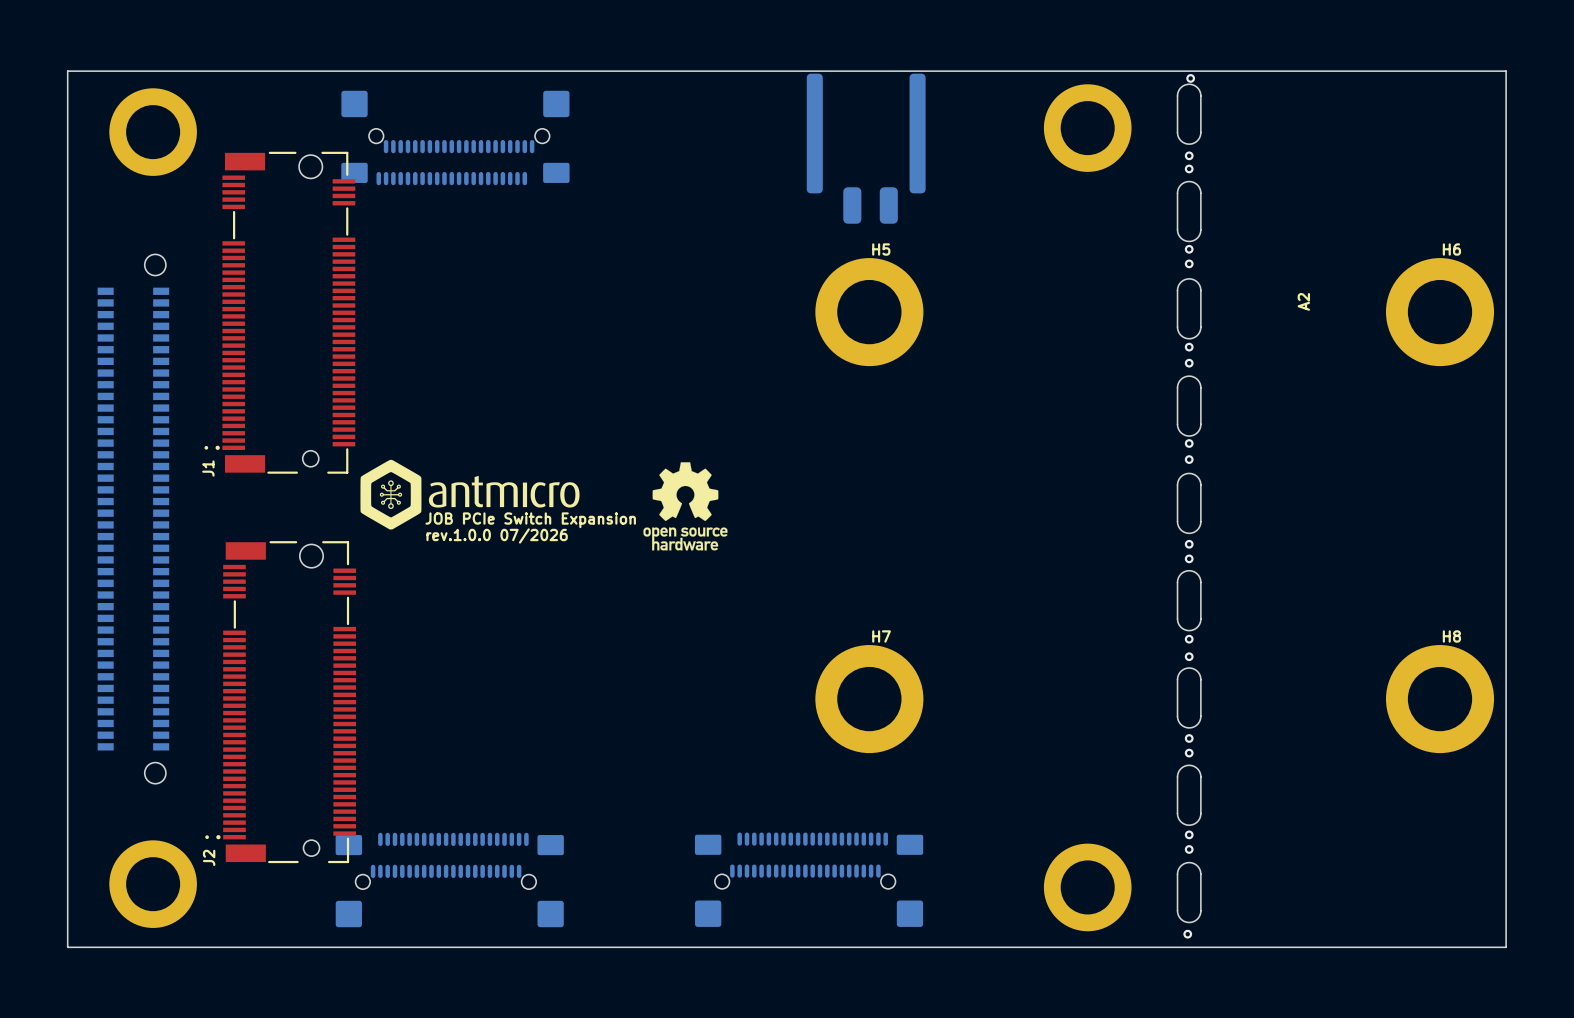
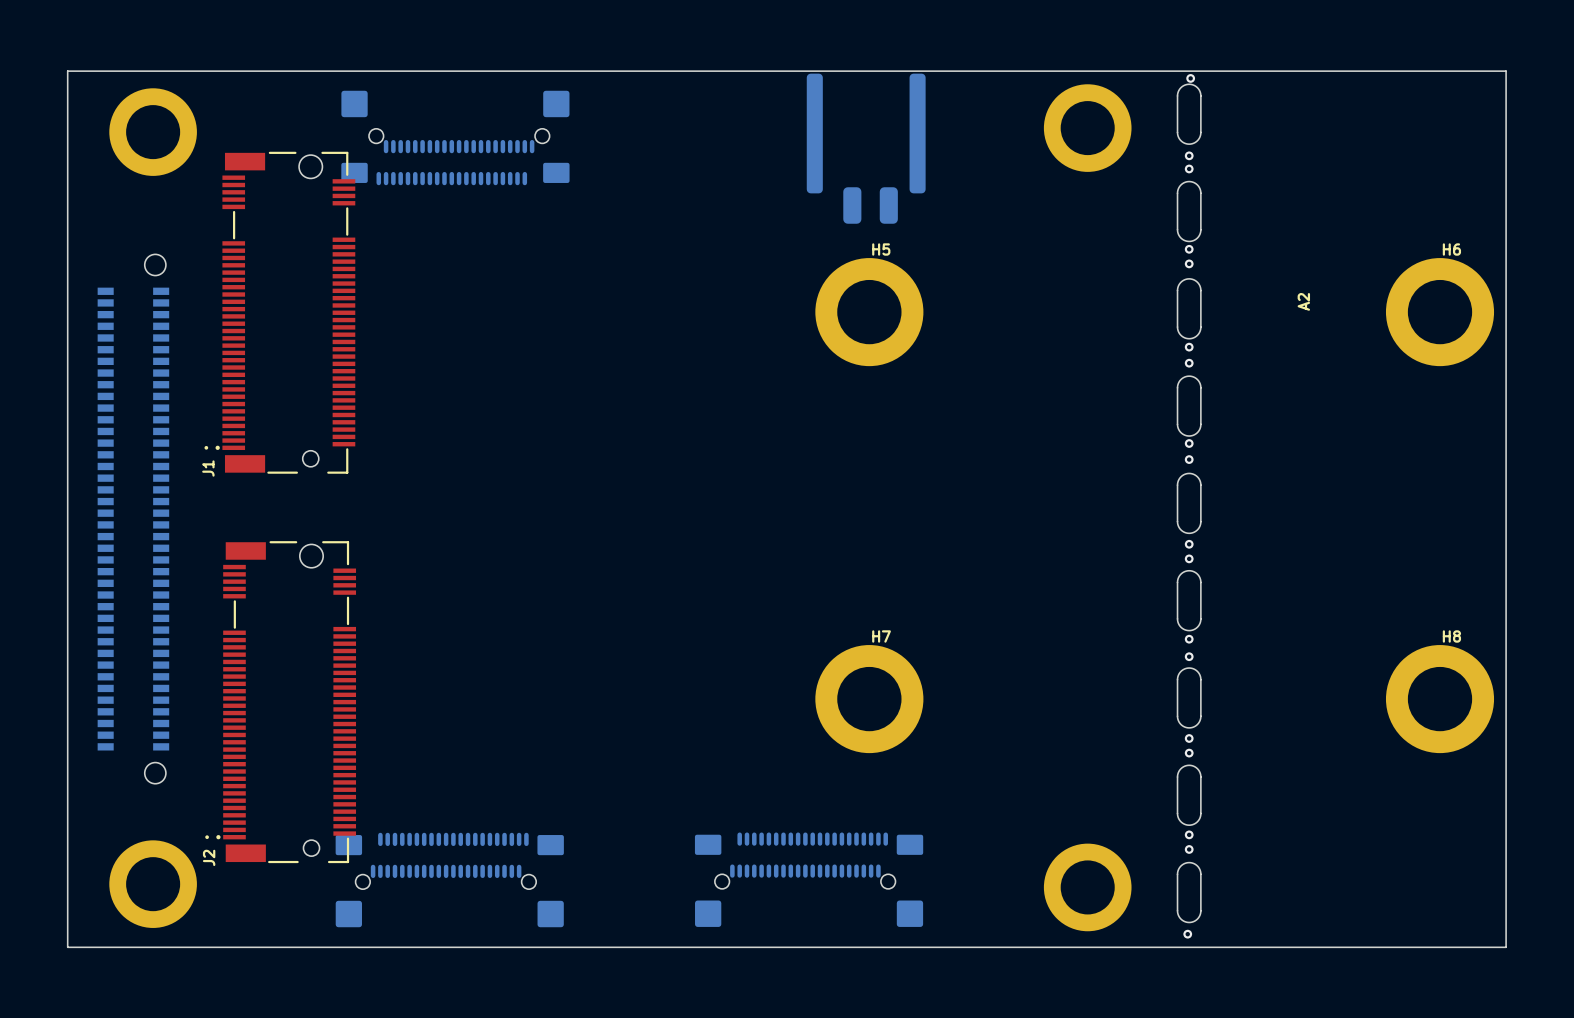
drawing: [360, 459, 580, 530] -> none
drawing: [643, 462, 728, 551] -> none
text: JOB PCIe Switch Expansion (530, 520) -> none
text: rev.1.0.0 07/2026 (497, 535) -> none

